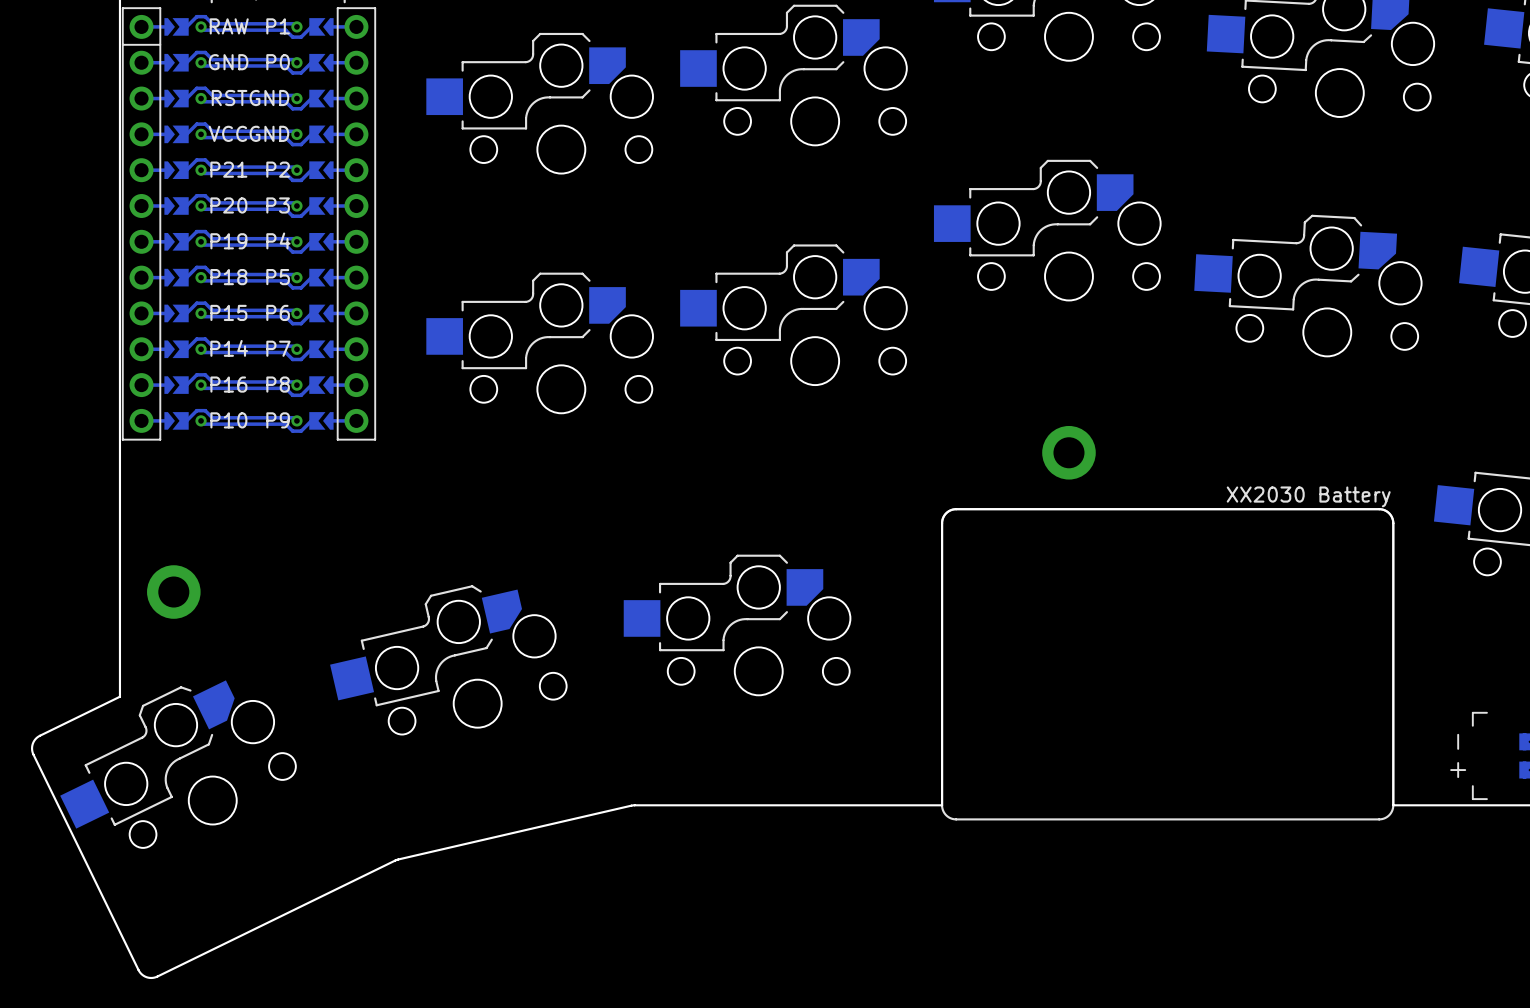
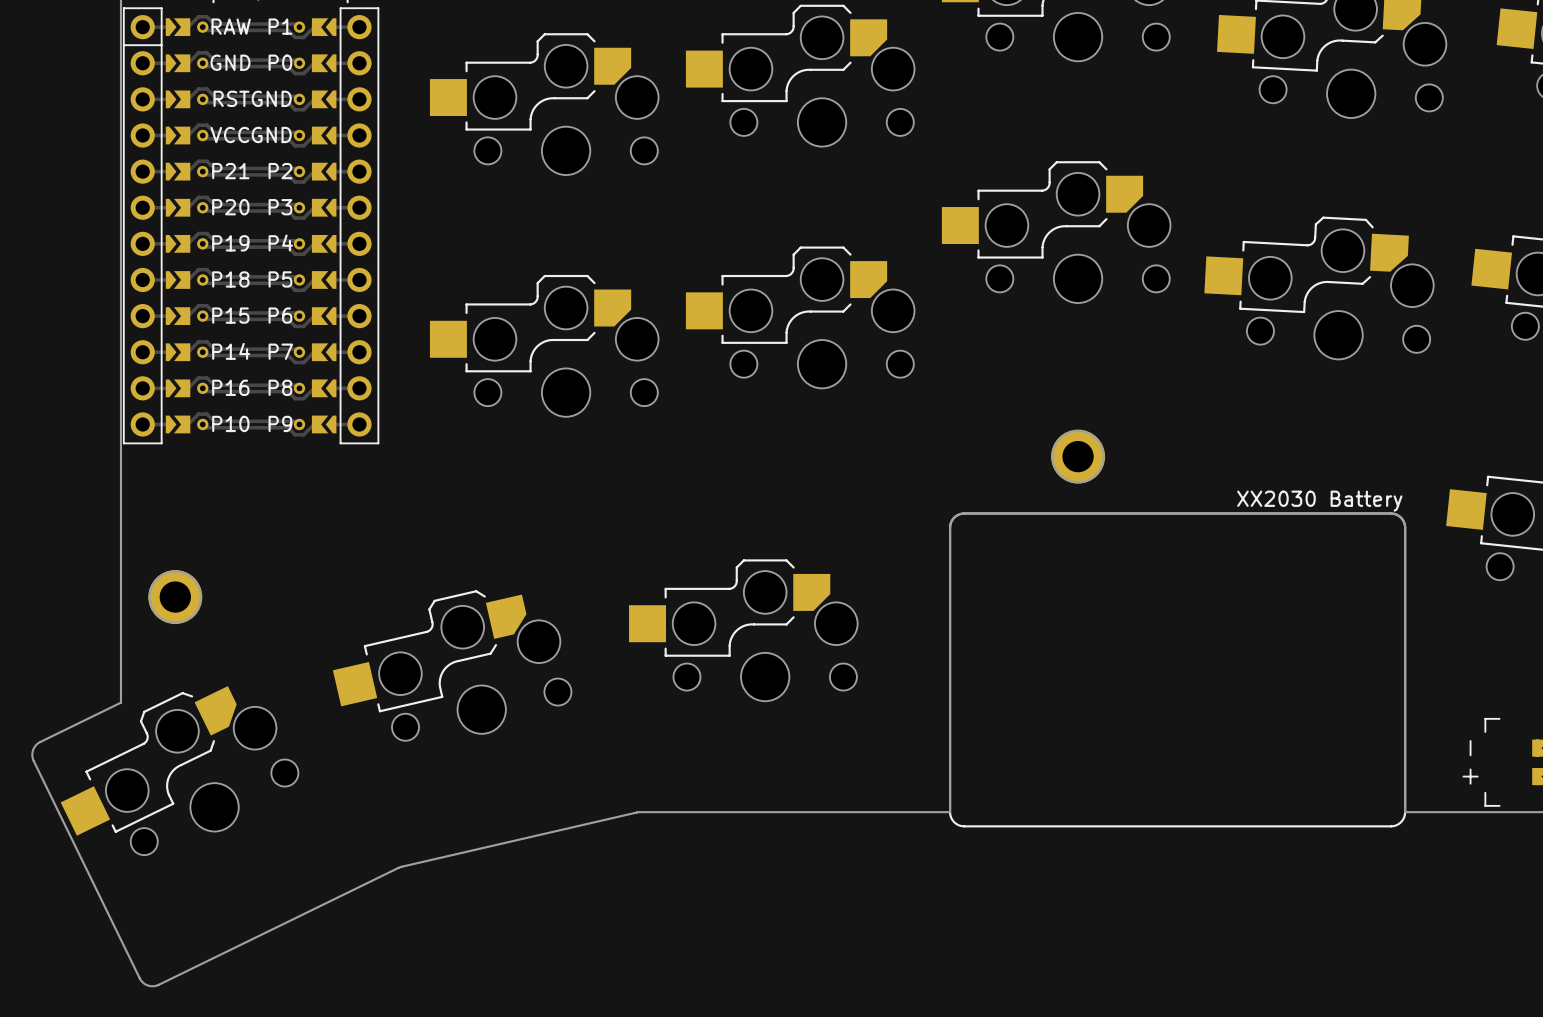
round board edge: none -> [1051, 429, 1105, 484]
round board edge: none -> [148, 570, 202, 624]

